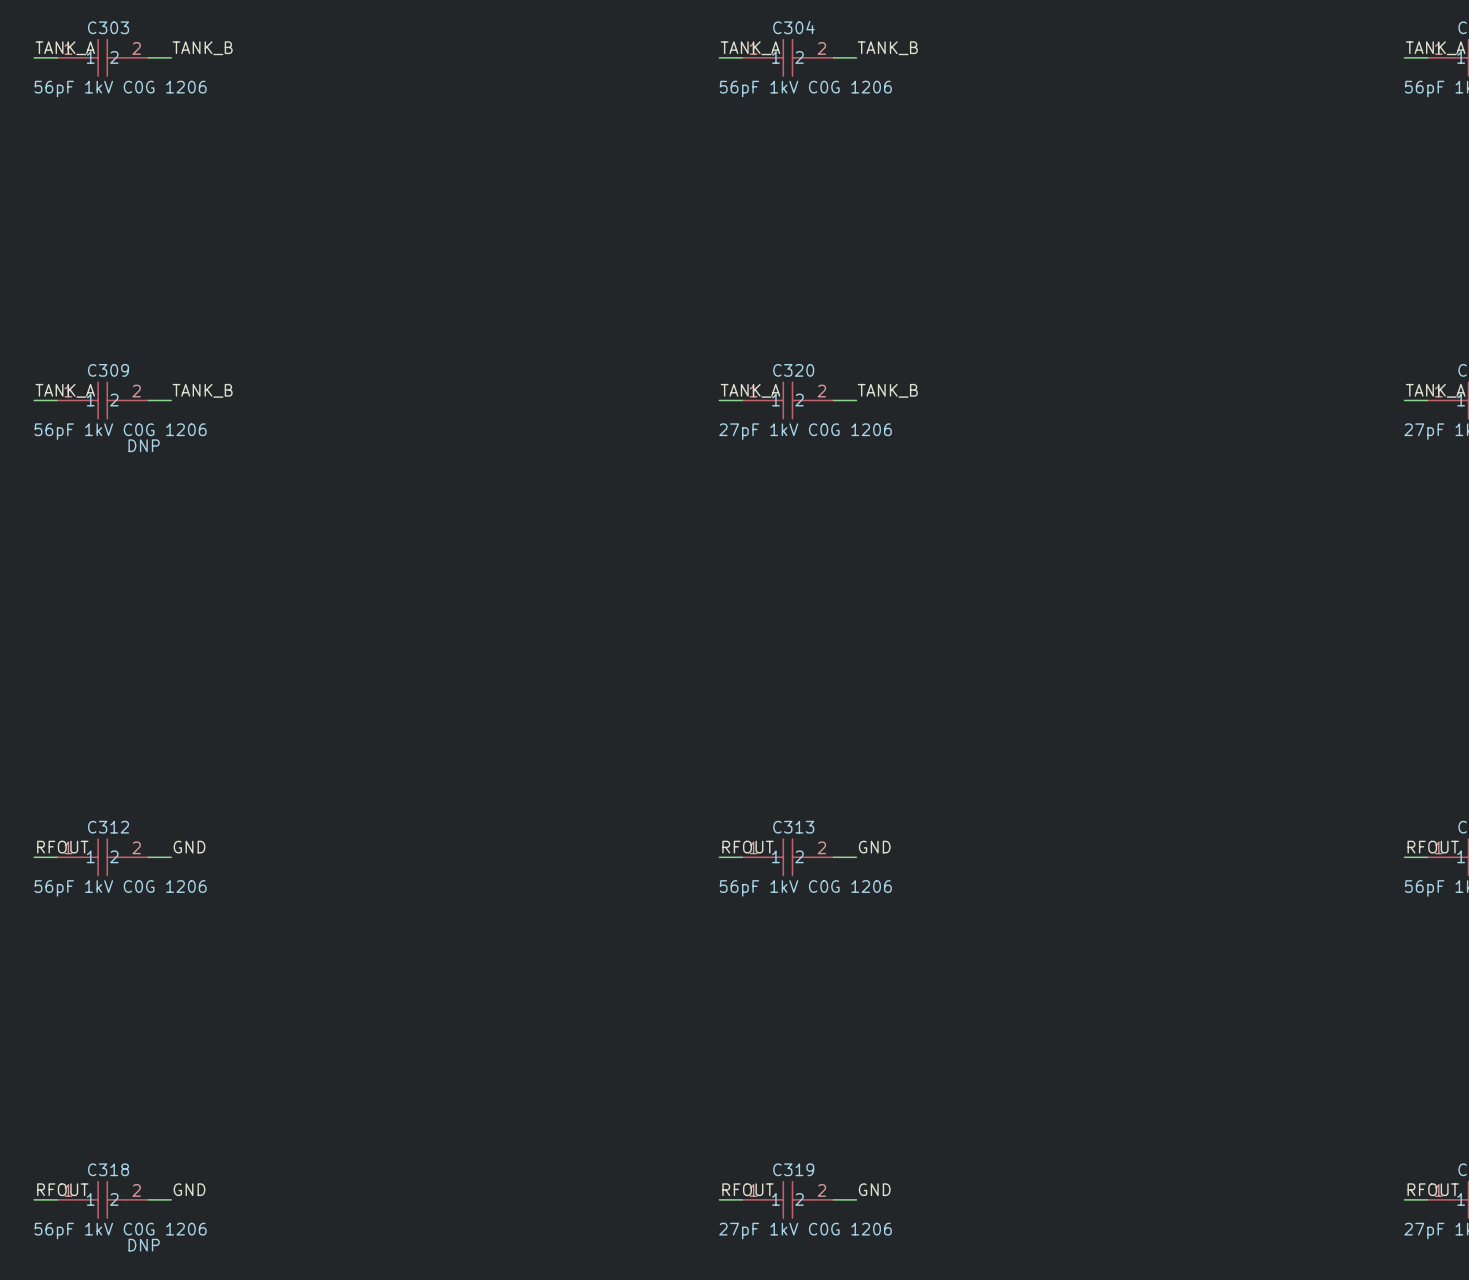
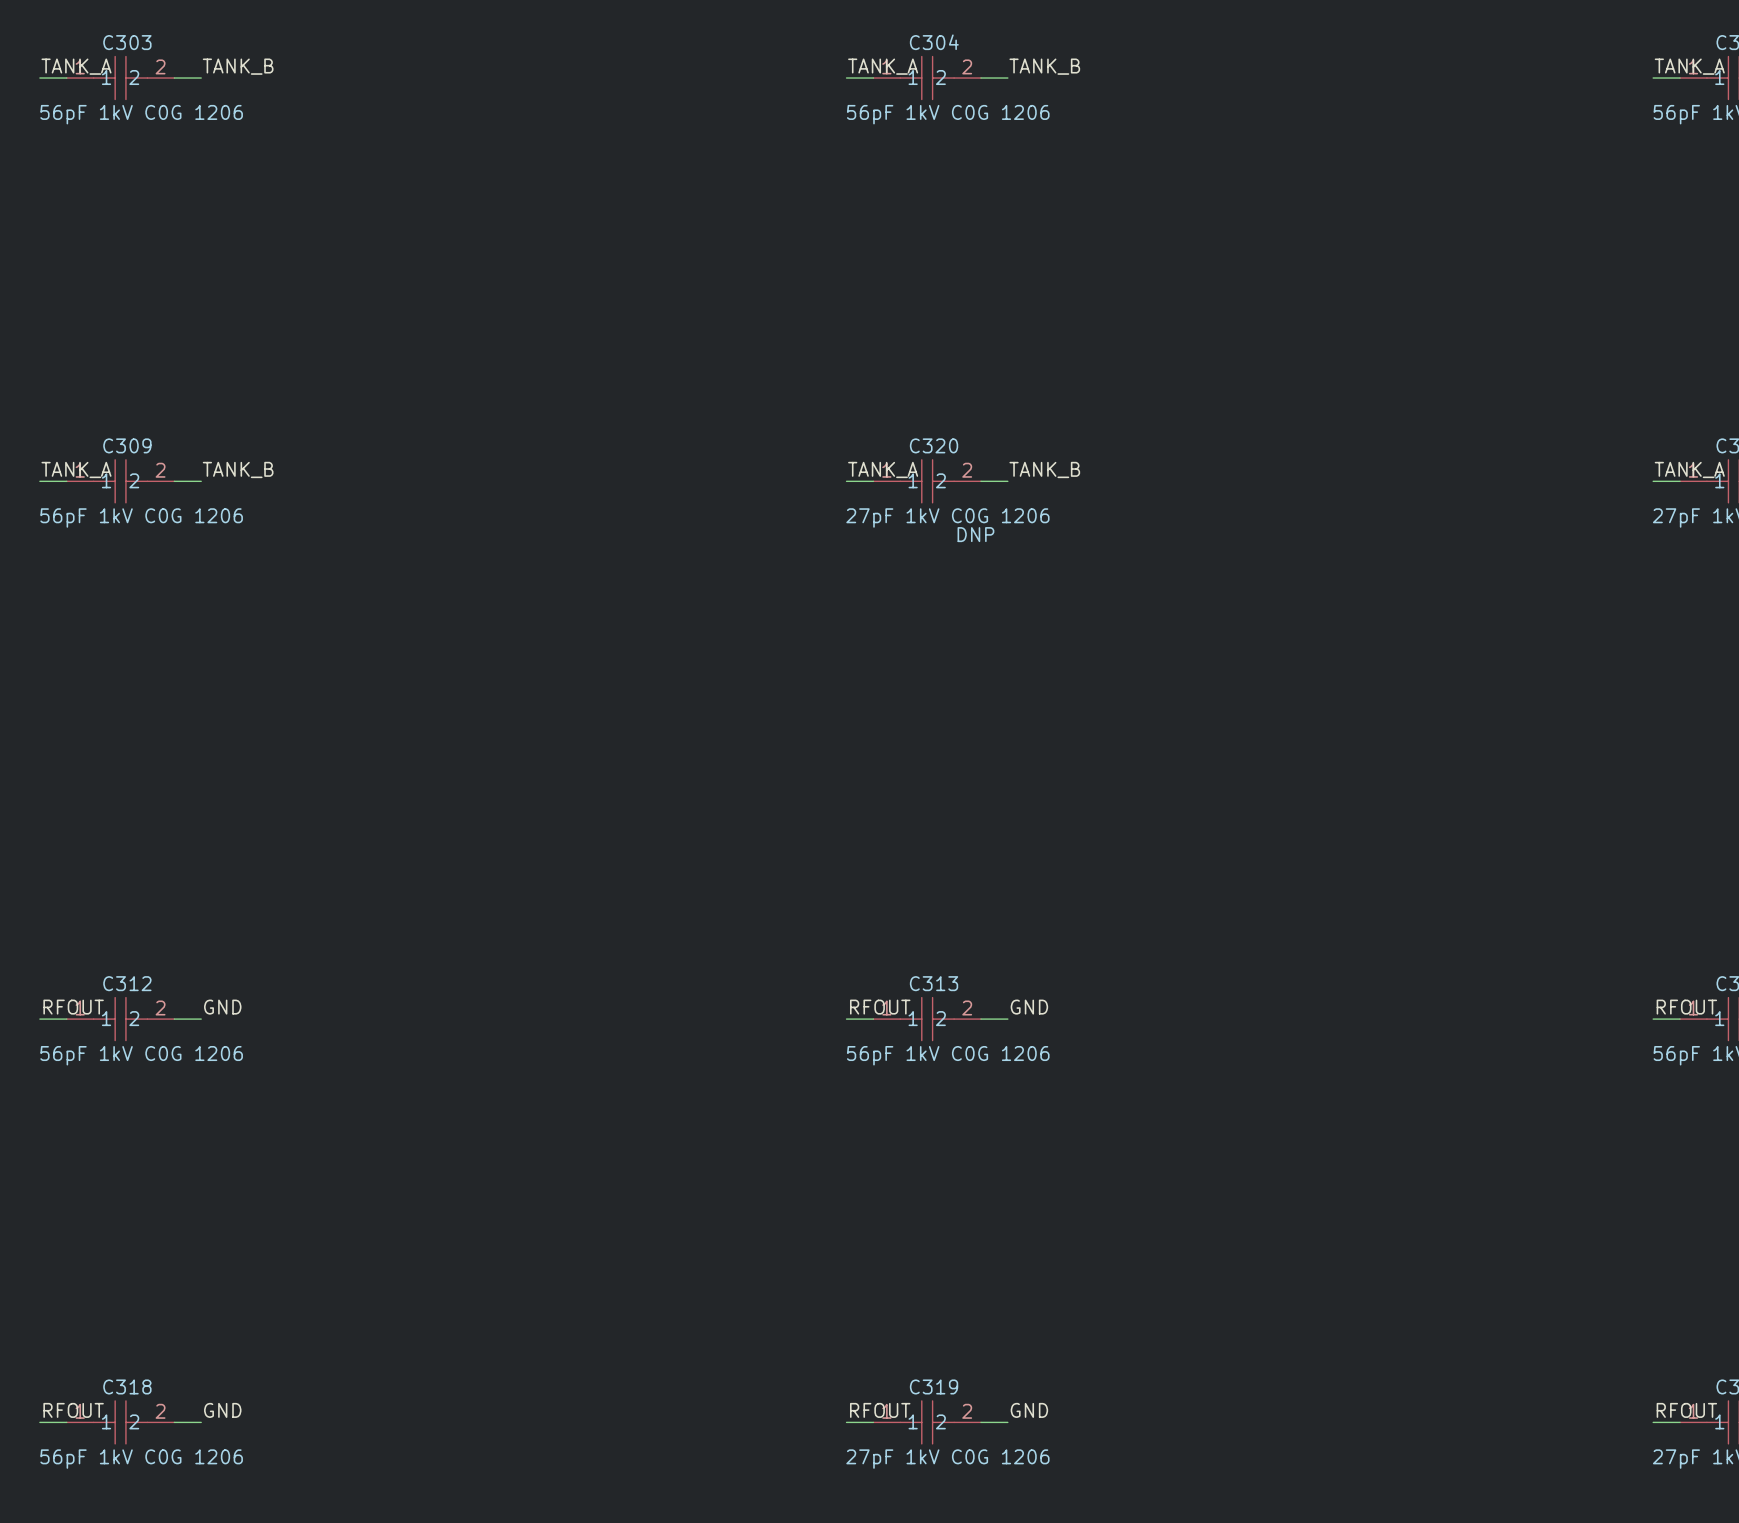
C309 text: DNP (144, 445) -> none
C320 text: none -> DNP (975, 534)
C318 text: DNP (144, 1245) -> none

